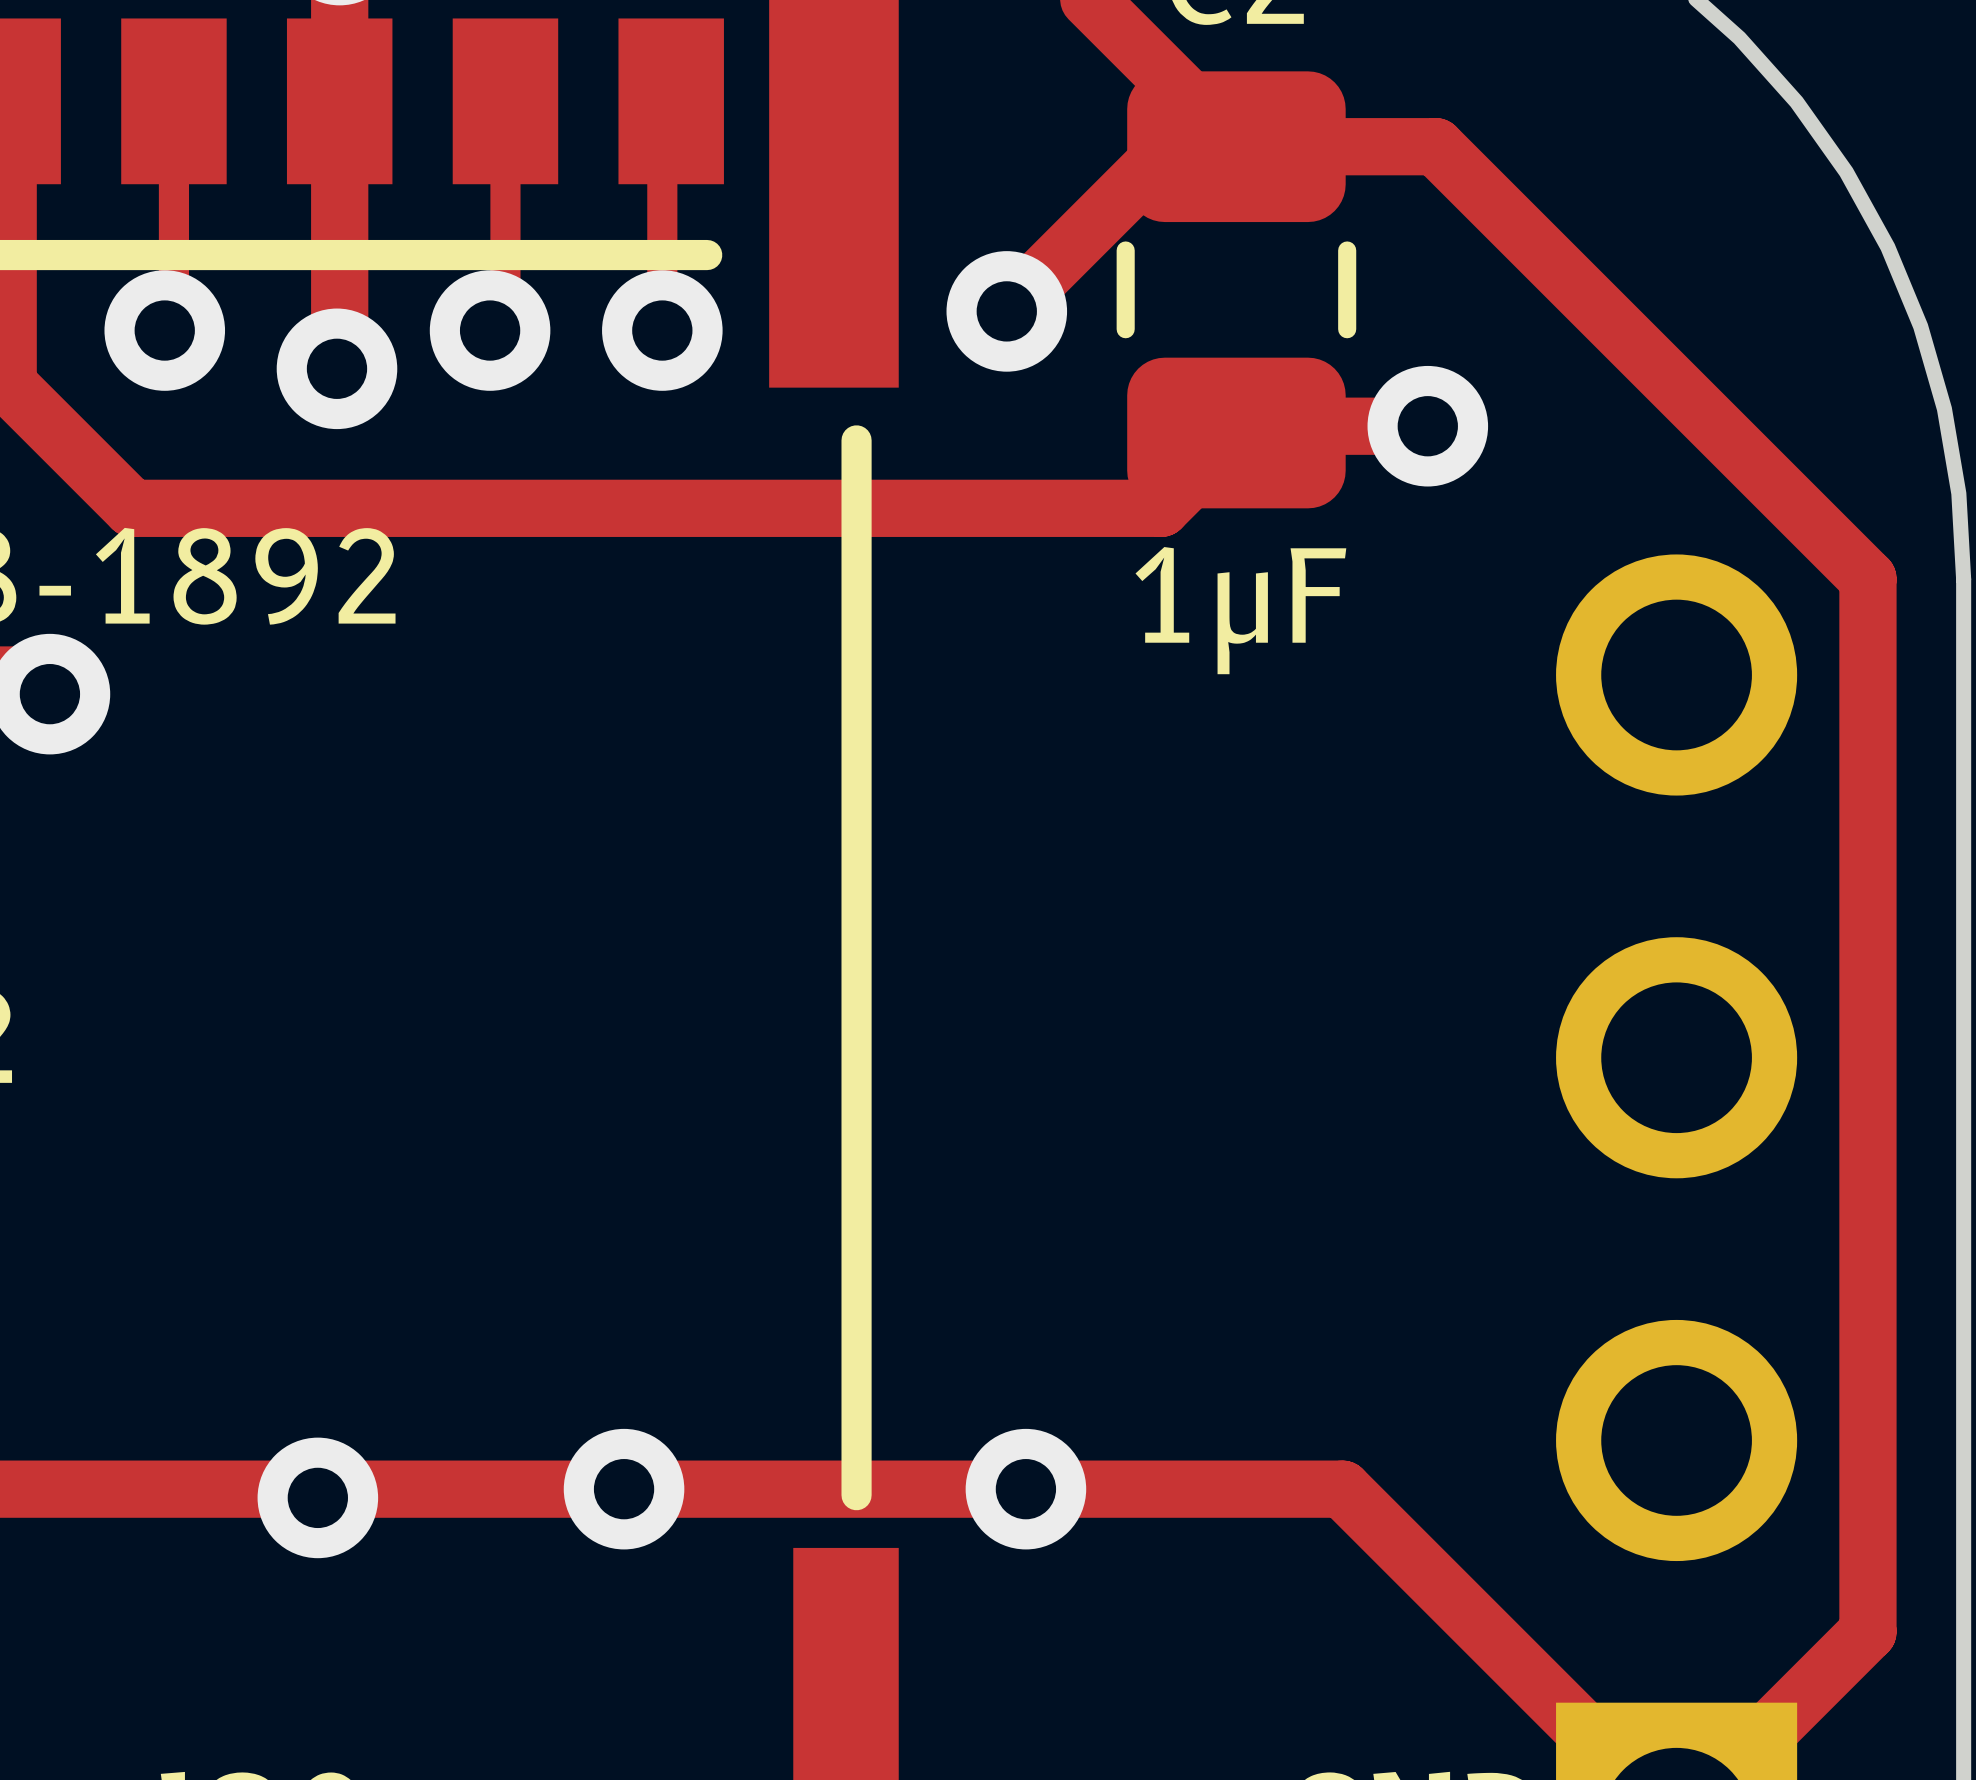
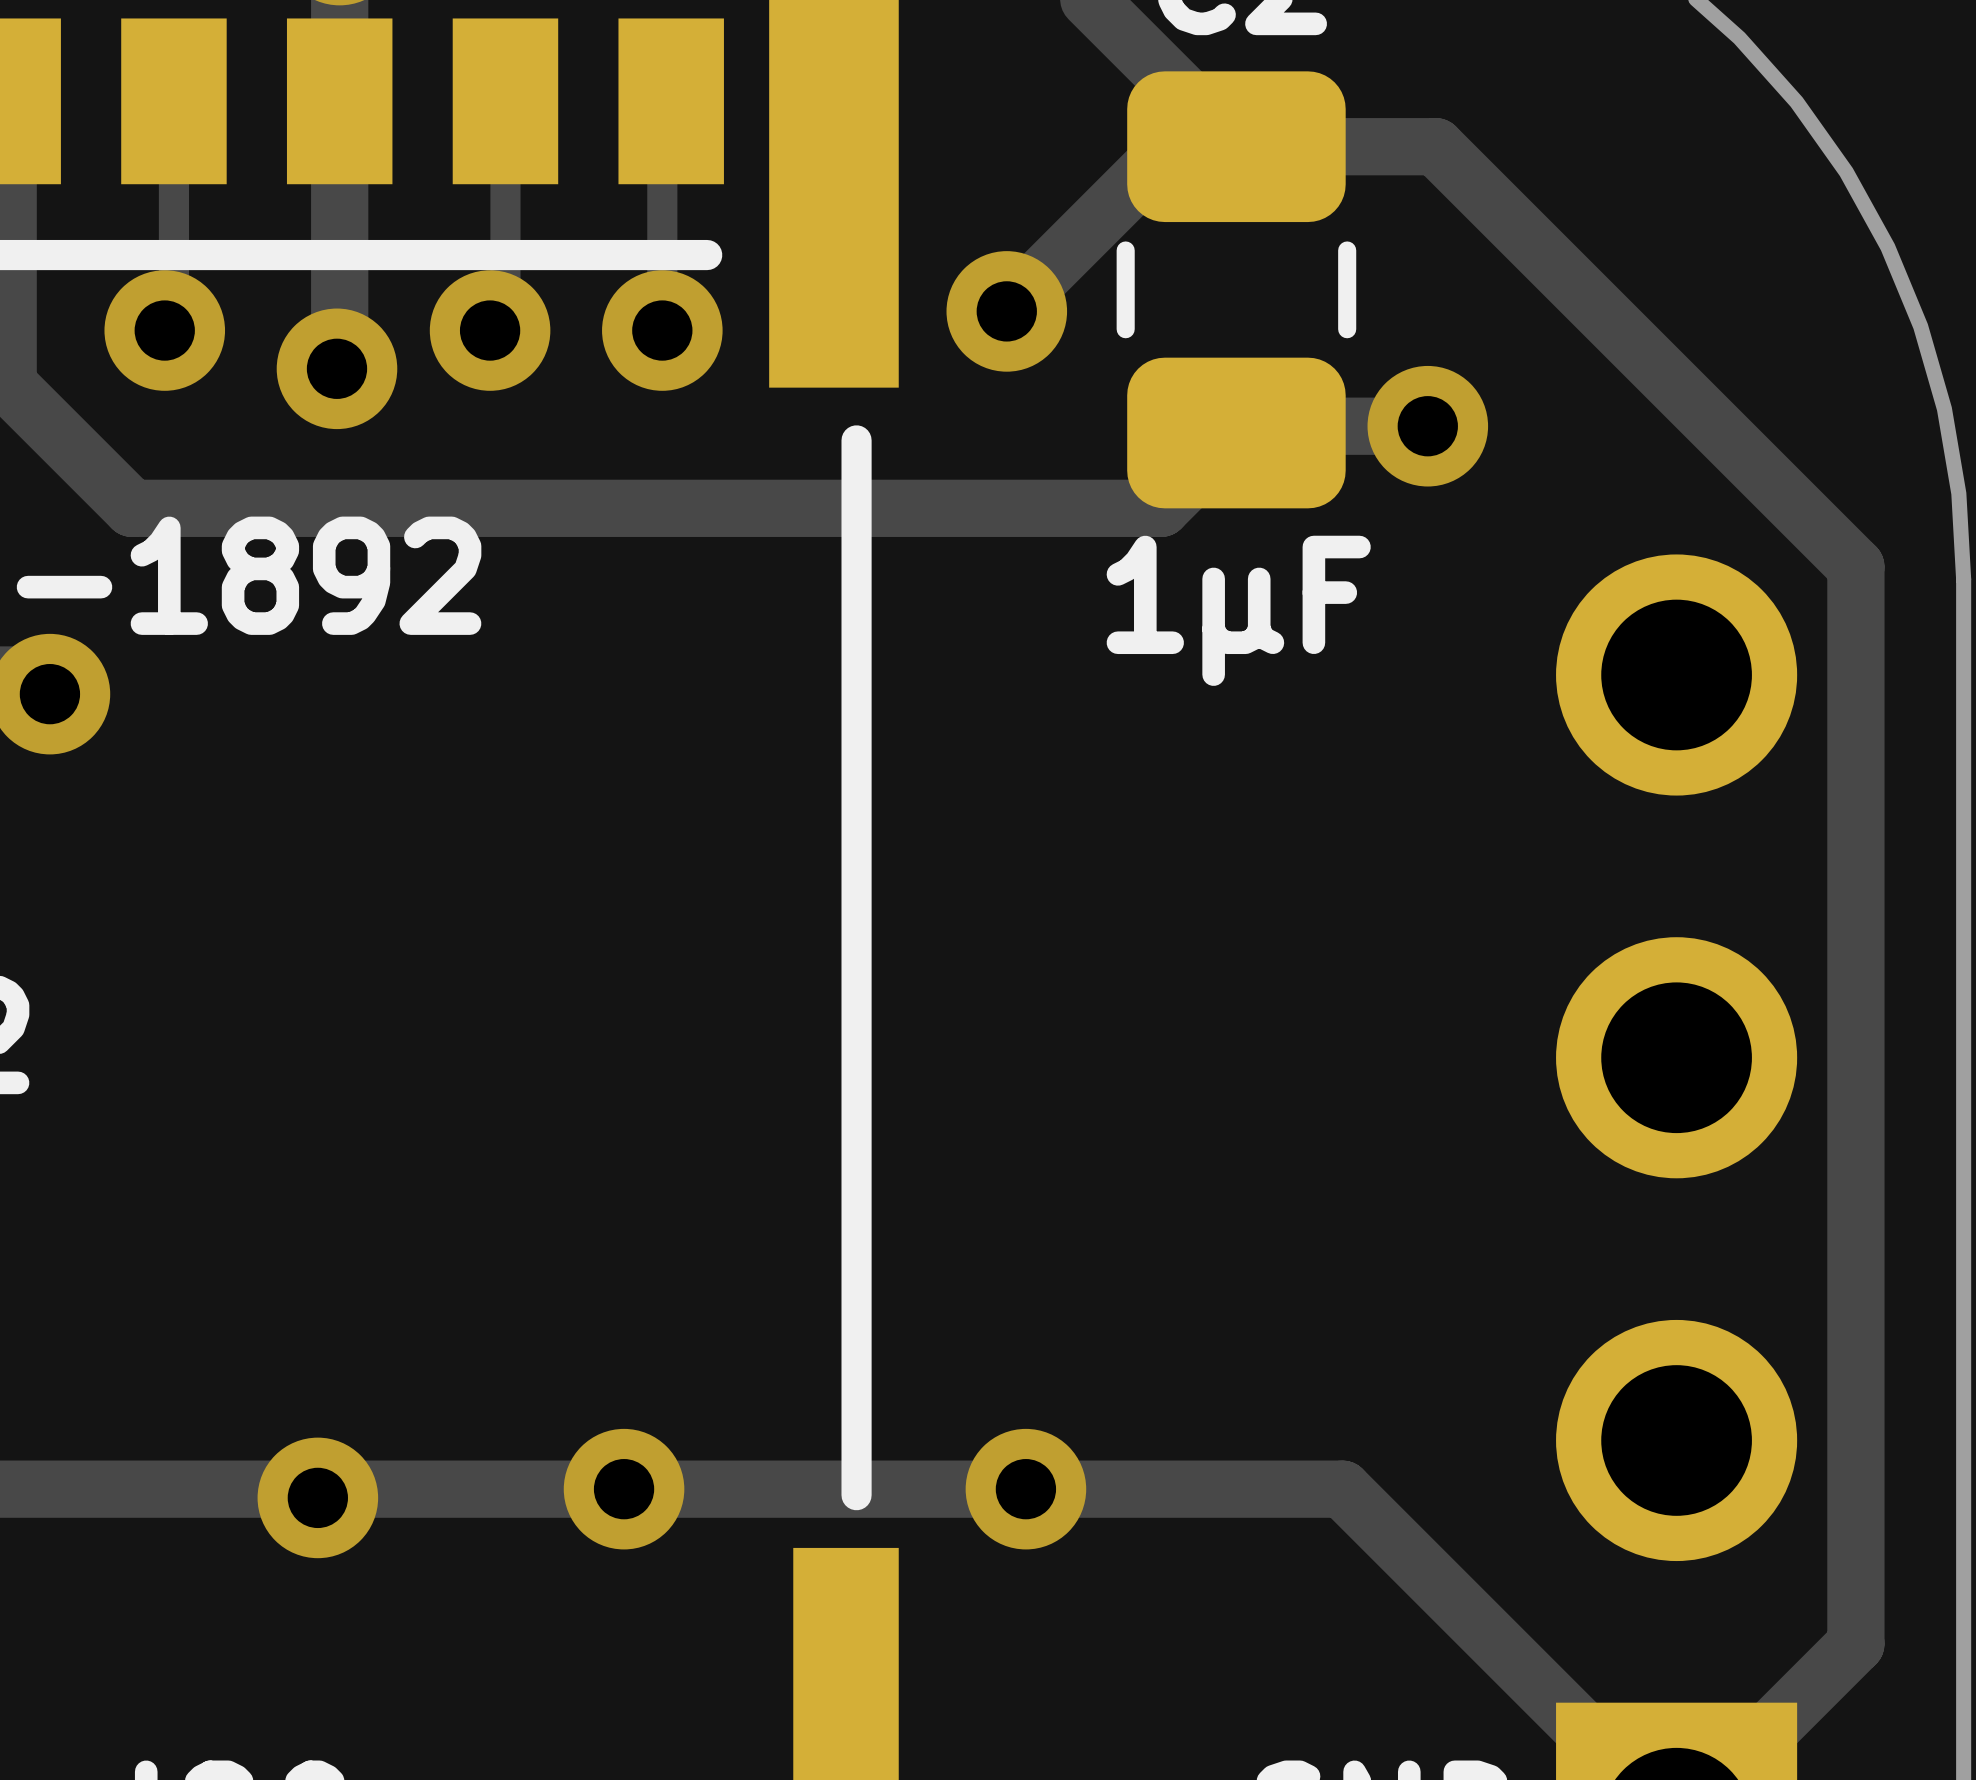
track: (1855, 566) (1867, 578) (1867, 1631) (1855, 1643) -> (1855, 566) (1855, 1643)

